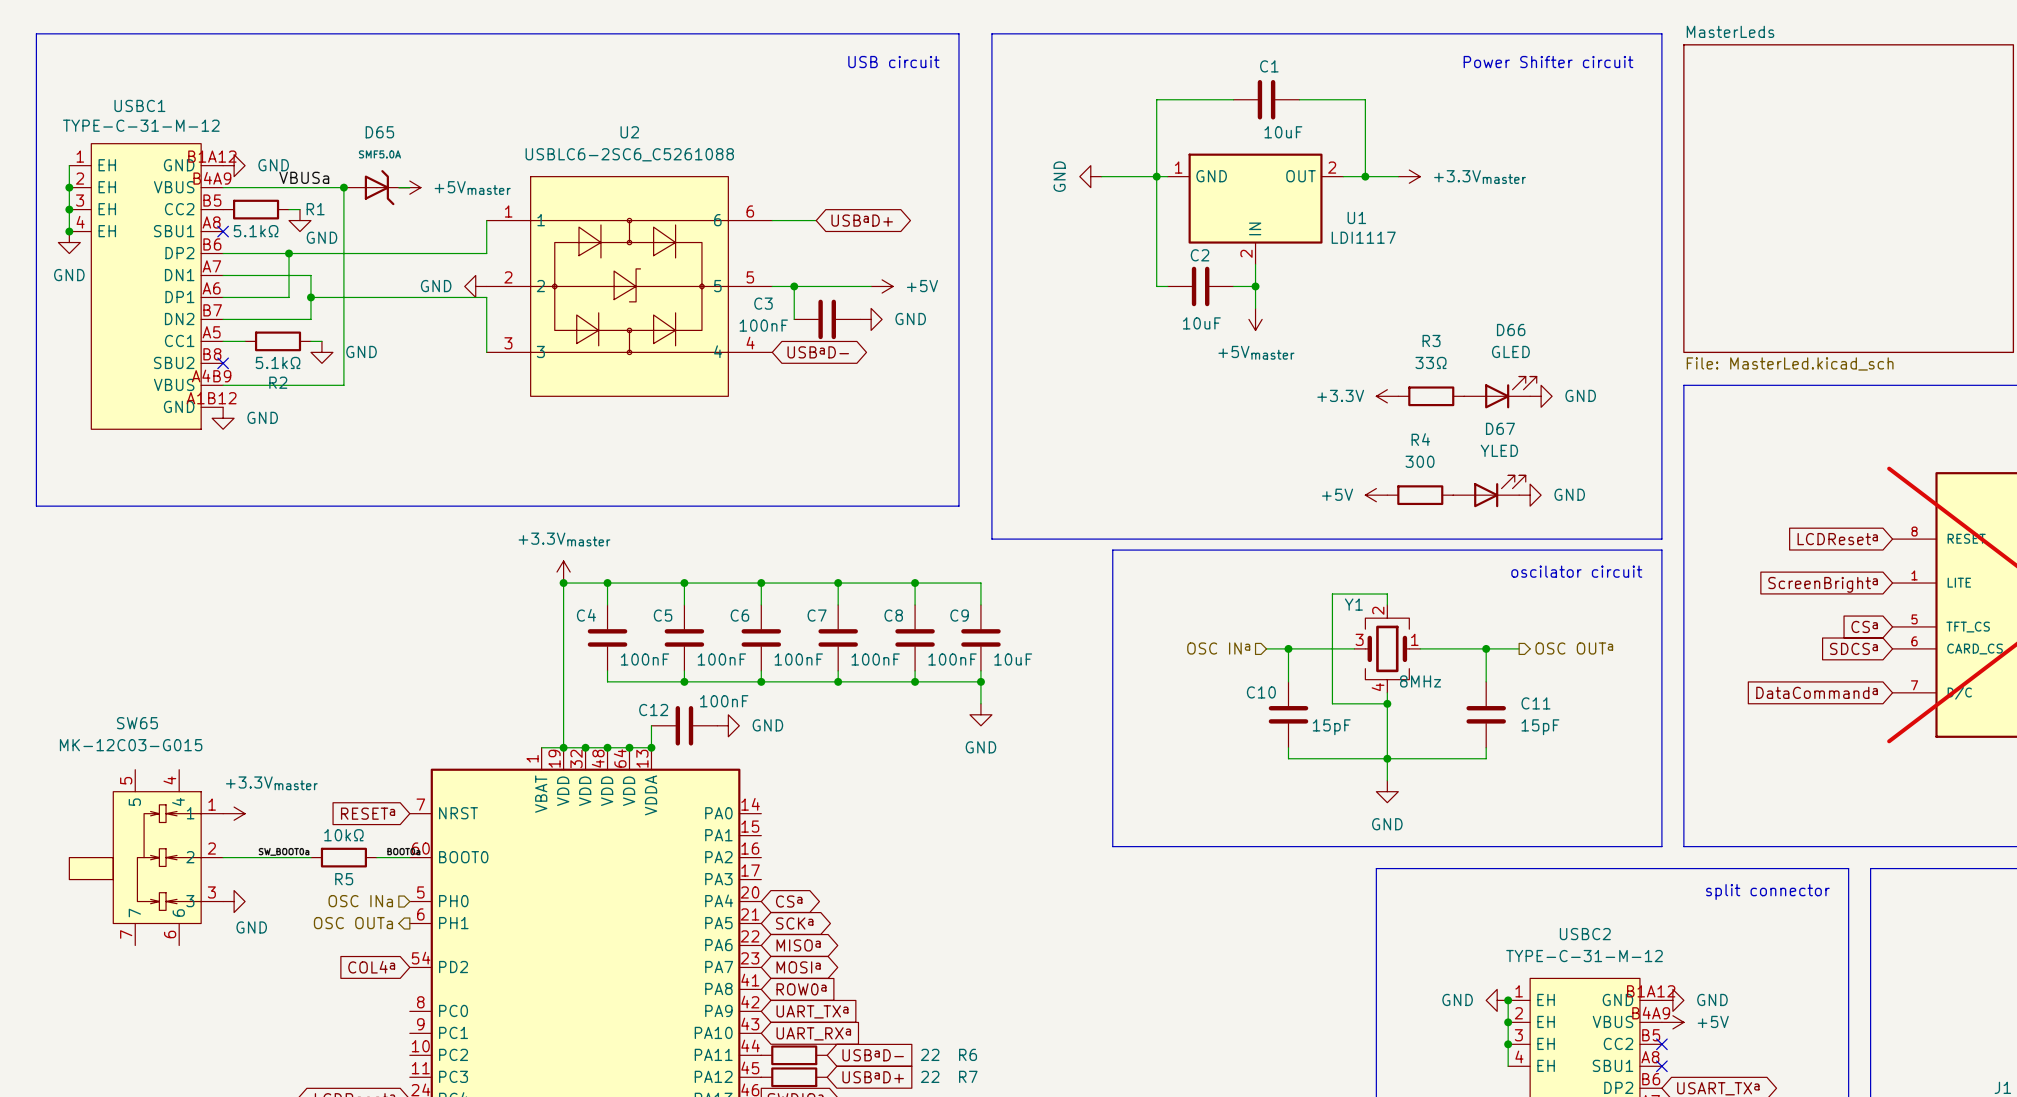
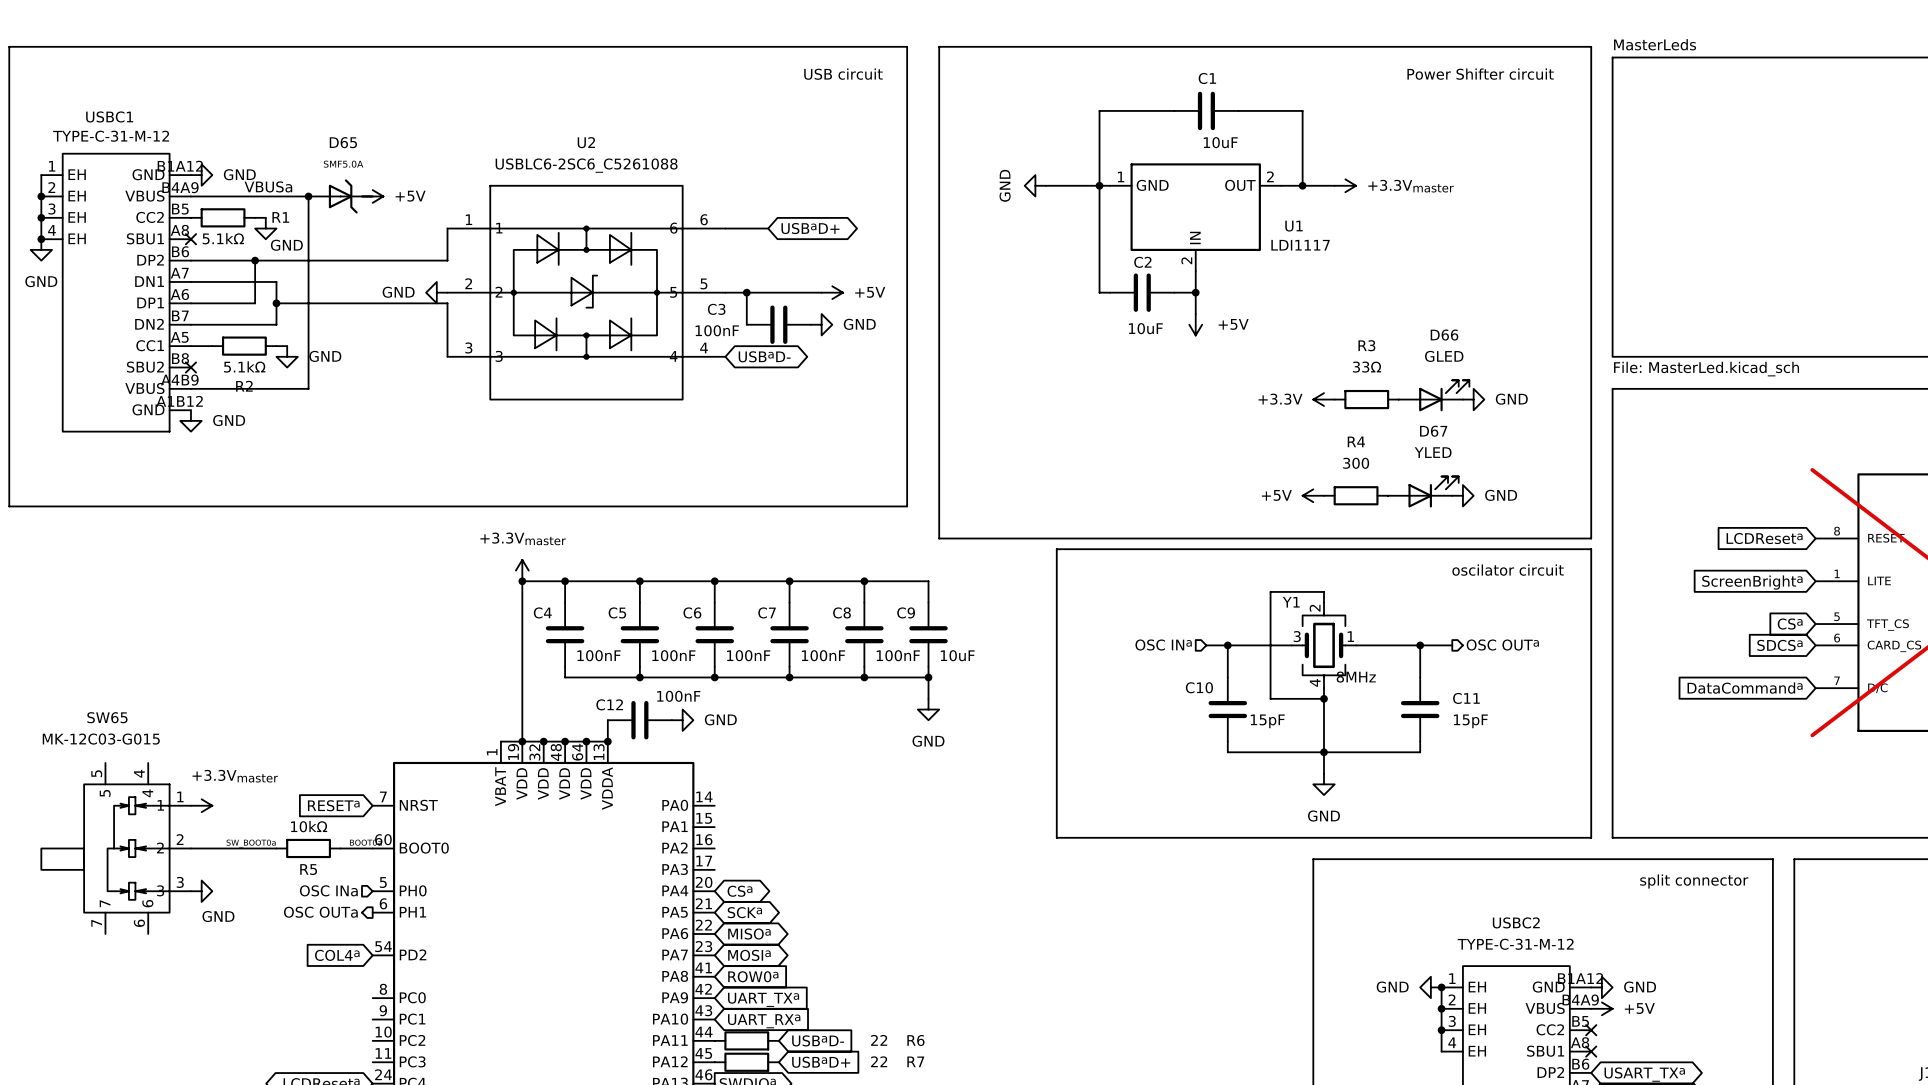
power symbol: +5Vmaster (409, 187) -> +5V (372, 196)
power symbol: +5Vmaster (1255, 319) -> +5V (1195, 324)

